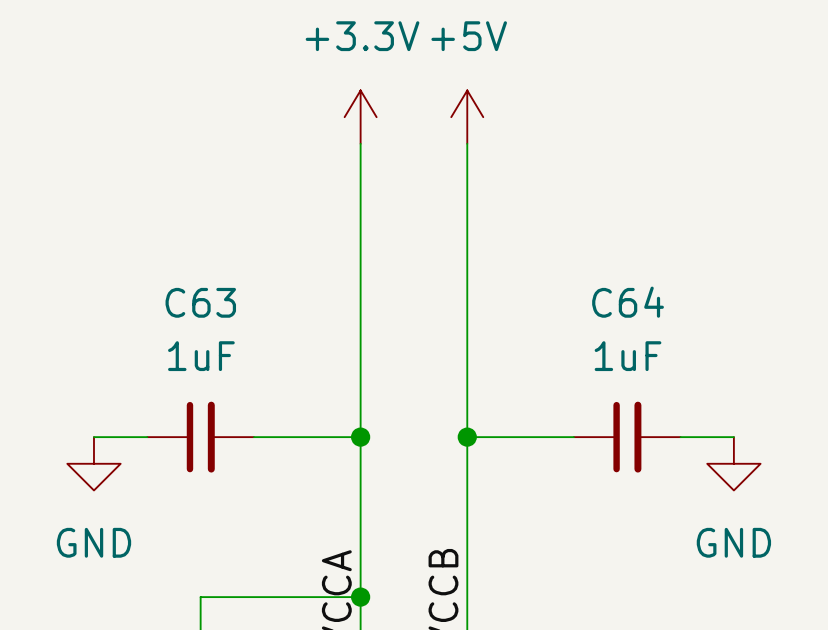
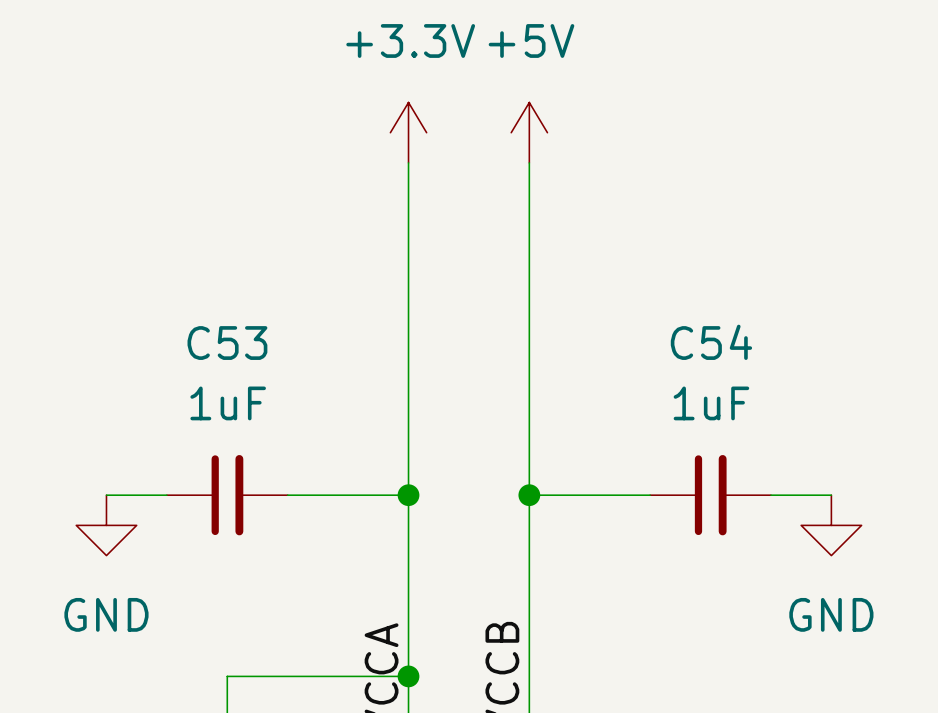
C63 name: C63 (200, 302) -> C53 (227, 343)
C64 name: C64 (628, 302) -> C54 (711, 342)

